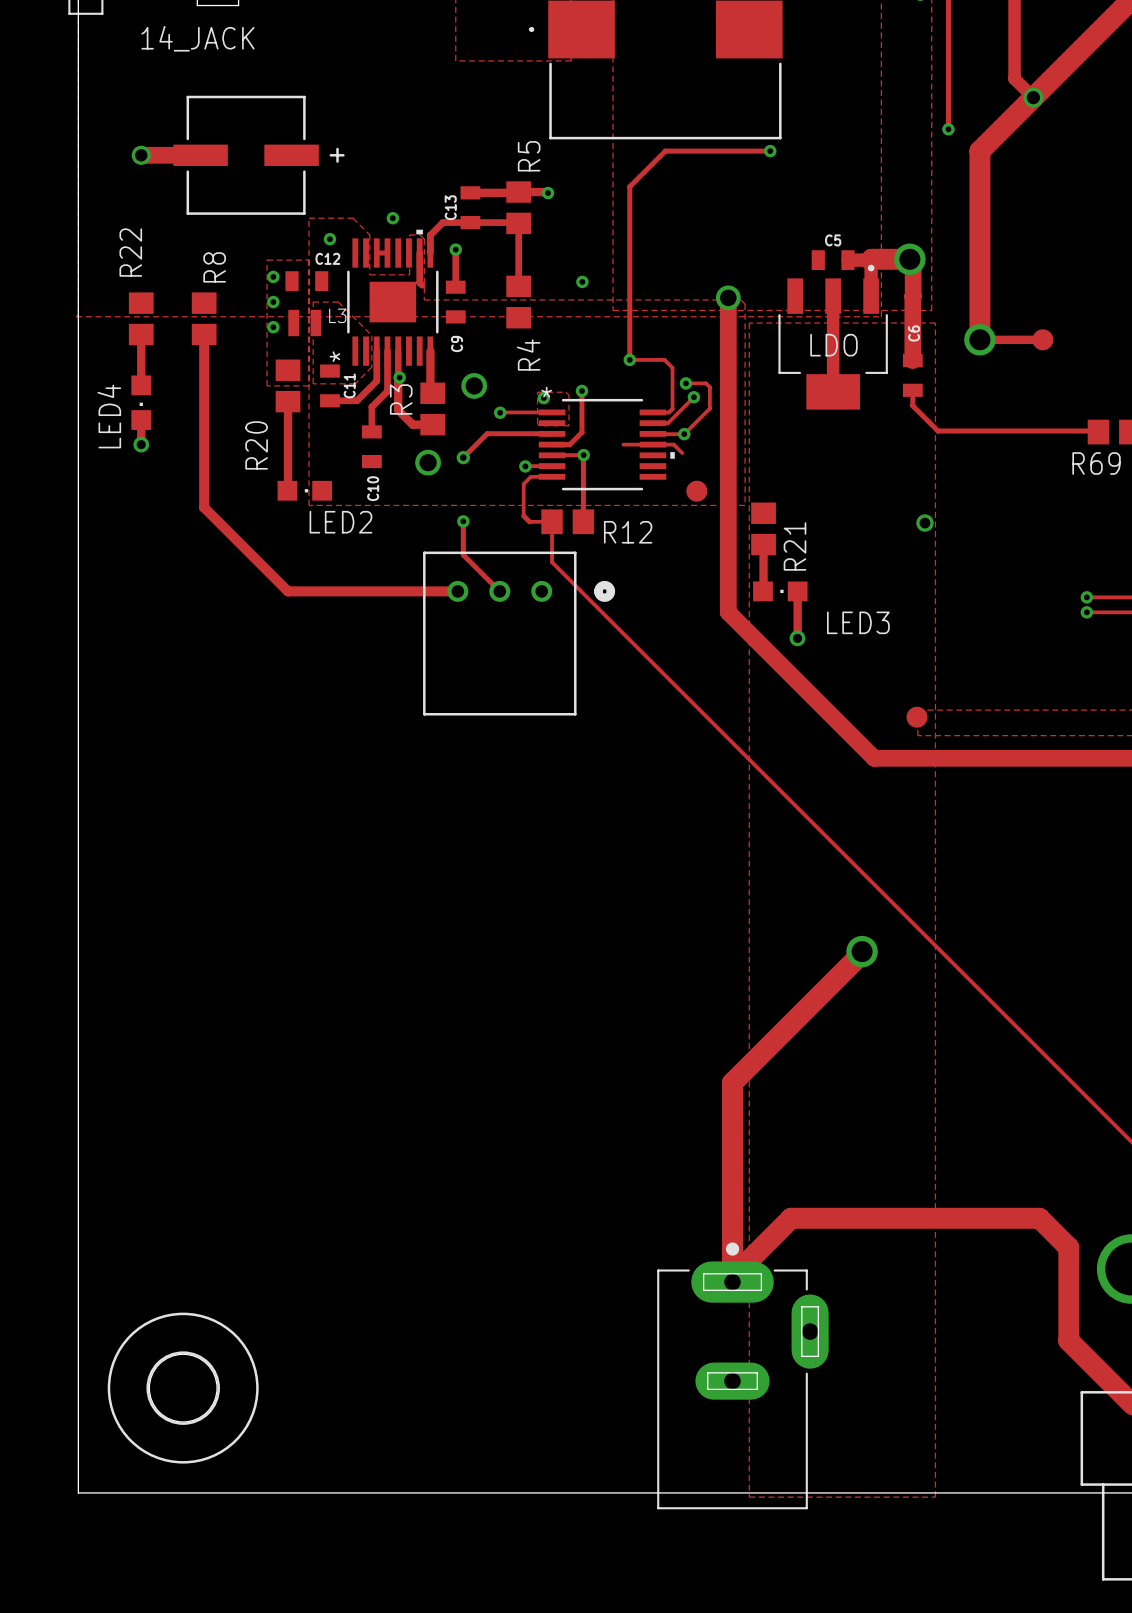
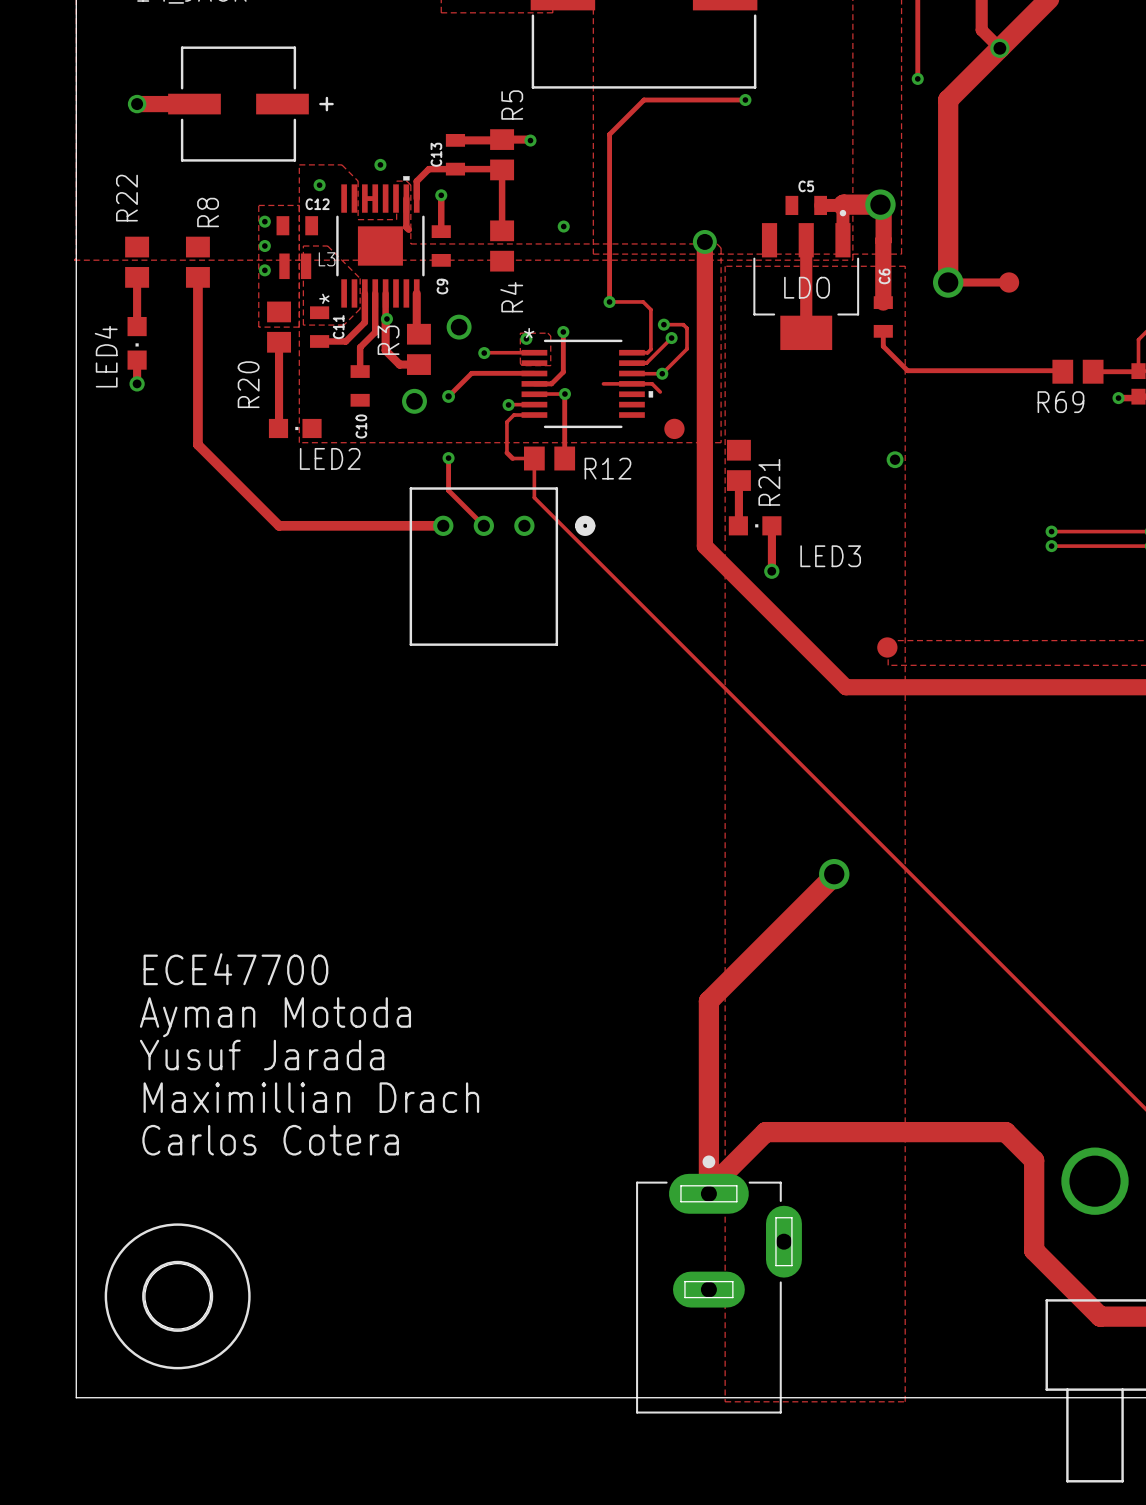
text: none -> ECE47700 (235, 969)
text: none -> Ayman Motoda (275, 1017)
text: none -> Yusuf Jarada (262, 1055)
text: none -> Maximillian Drach (311, 1097)
text: none -> Carlos Cotera (270, 1140)

